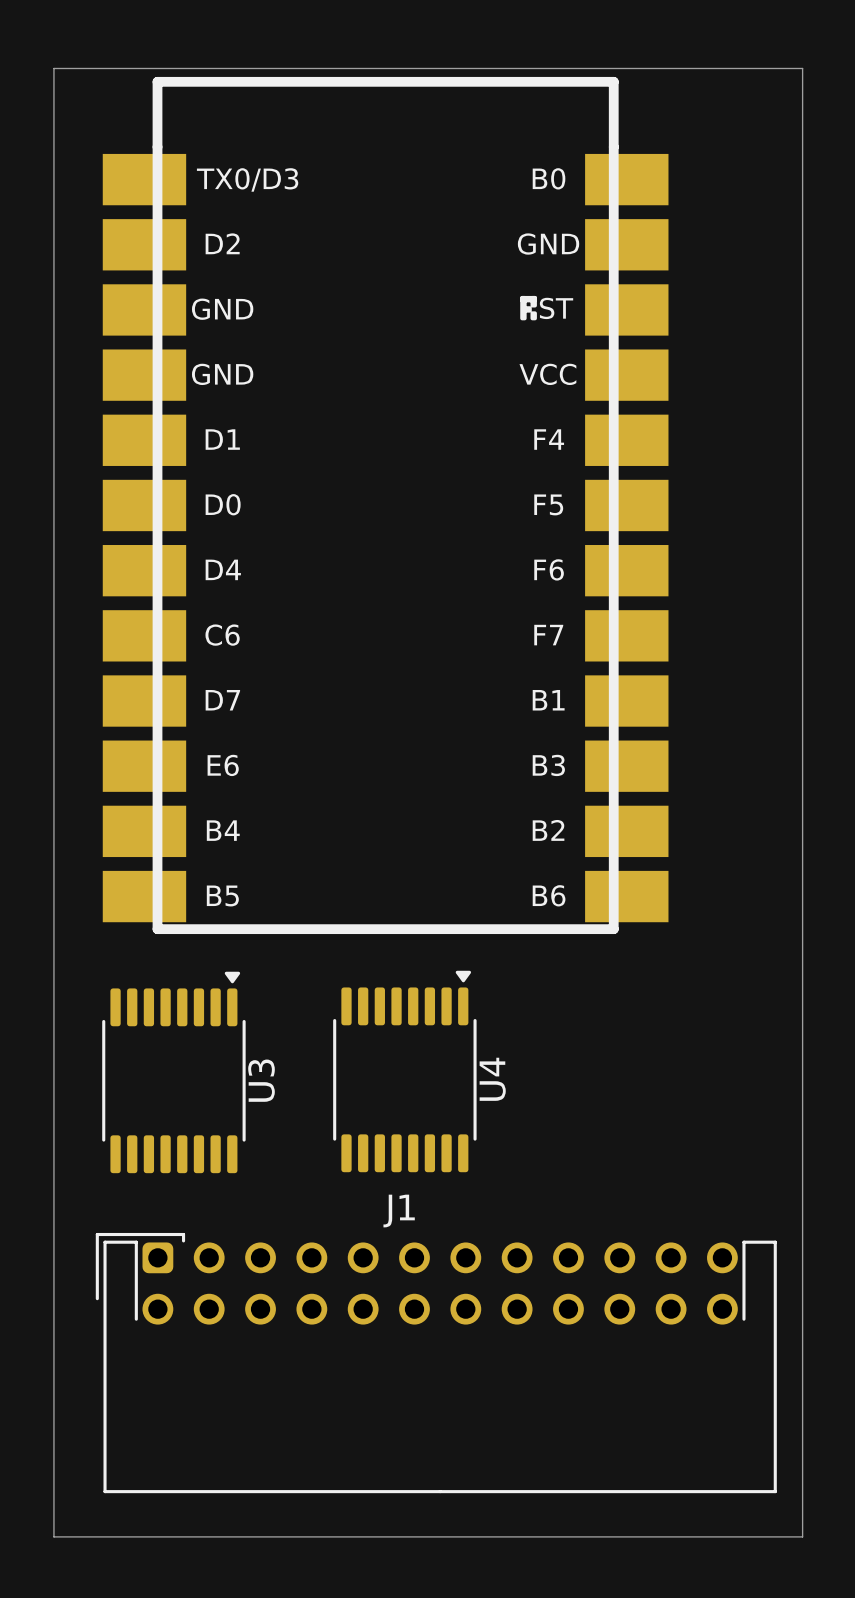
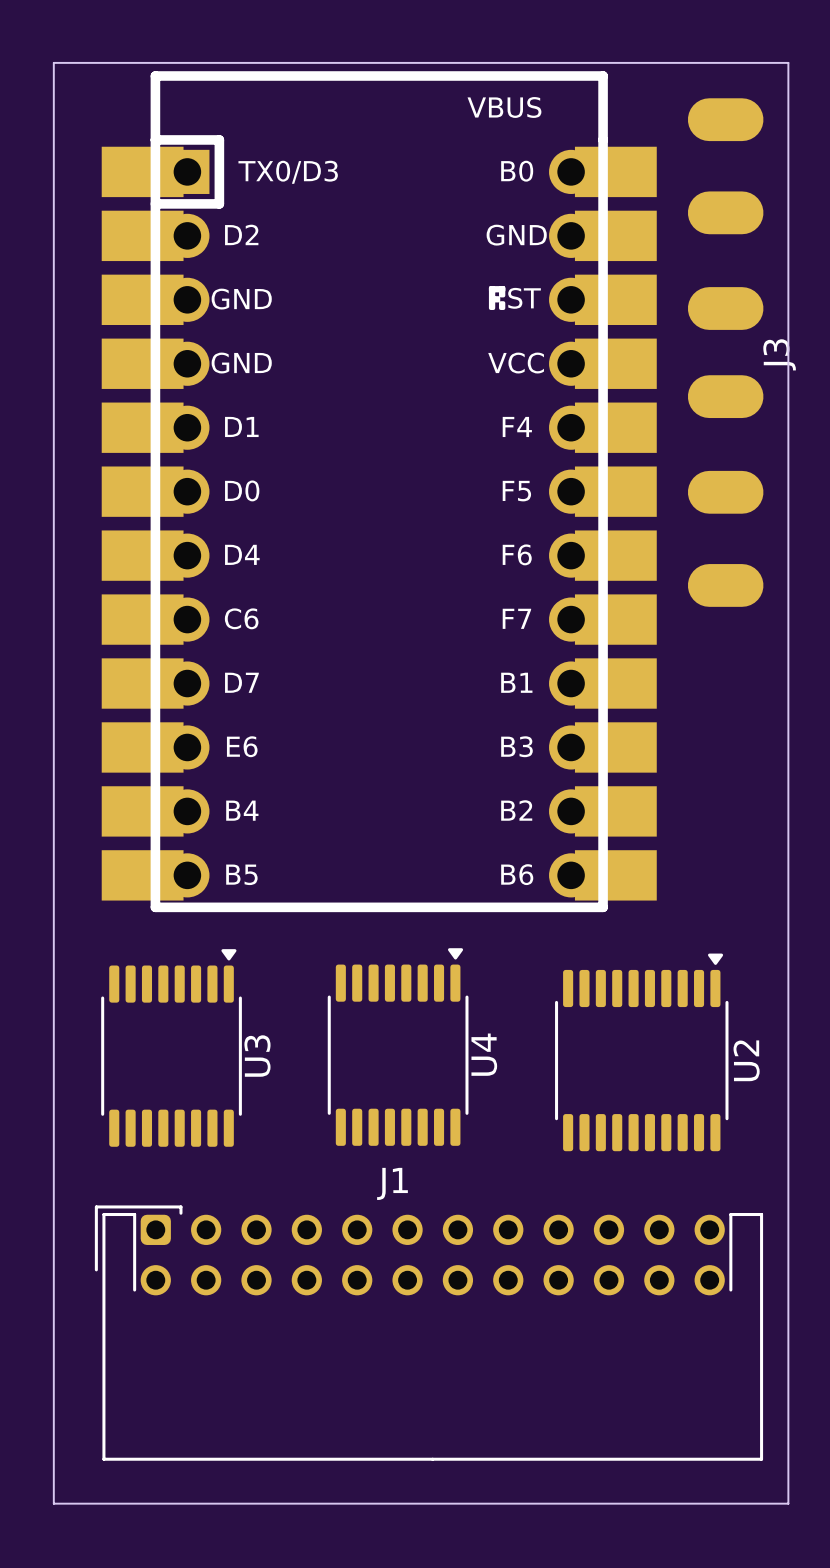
part footprint: [102, 76, 669, 935] -> [101, 71, 657, 913]
J3: none -> (725, 352)
U2: none -> (641, 1052)

